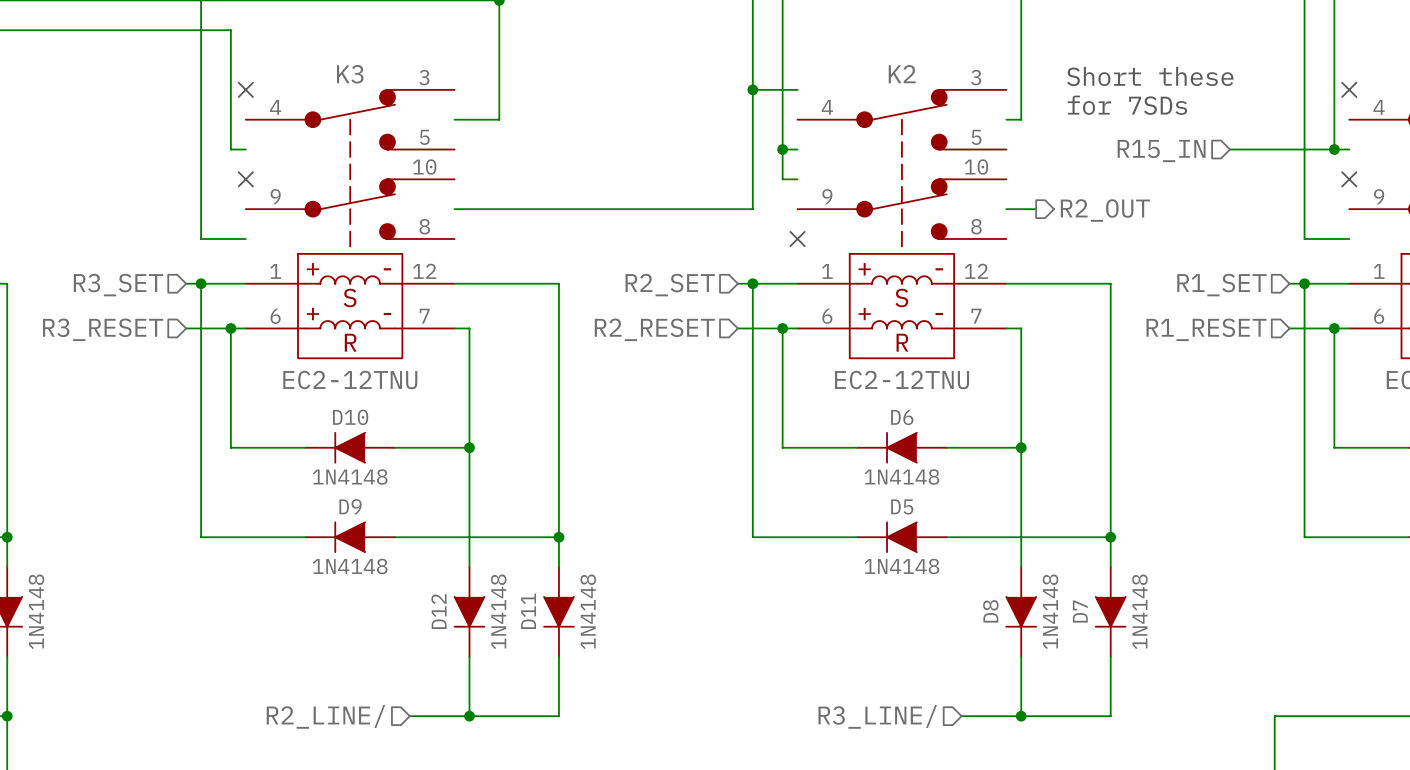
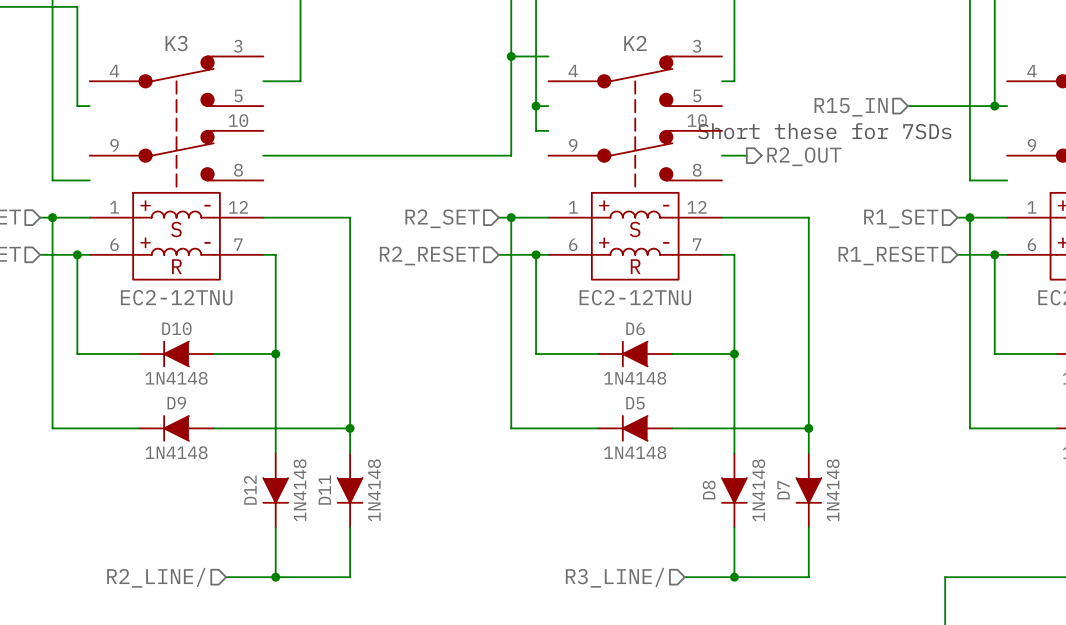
text: Short these (1150, 76) -> none
no-connect mark: (245, 89) -> none
no-connect mark: (1349, 89) -> none
text: for 7SDs (1127, 105) -> none
no-connect mark: (245, 179) -> none
text: none -> Short these for 7SDs (824, 131)
no-connect mark: (1349, 179) -> none
no-connect mark: (797, 238) -> none

